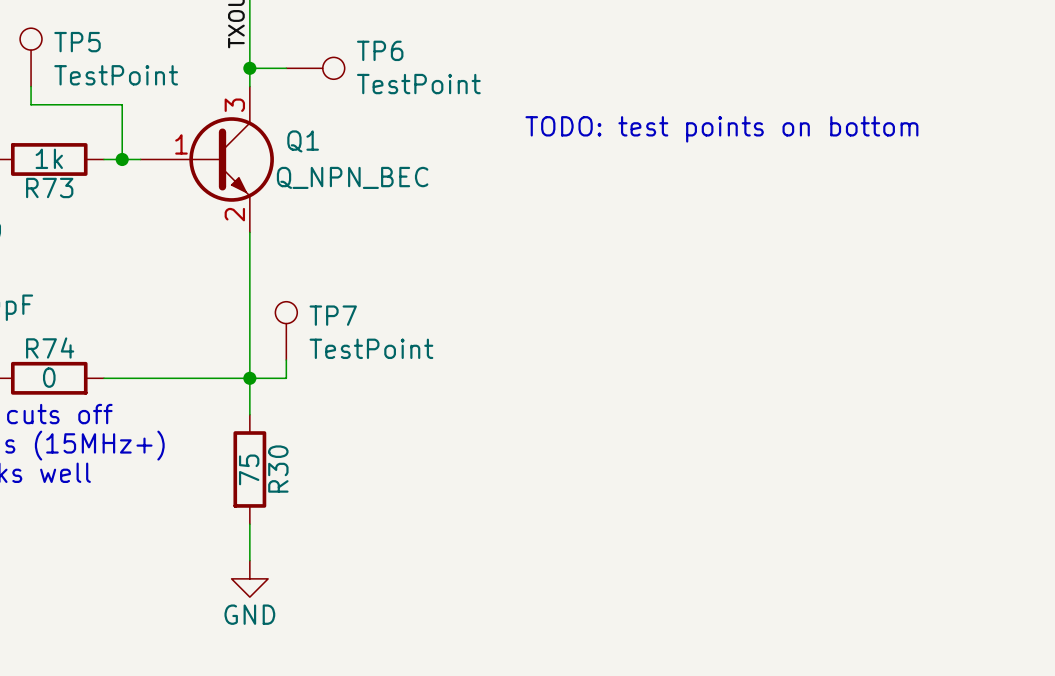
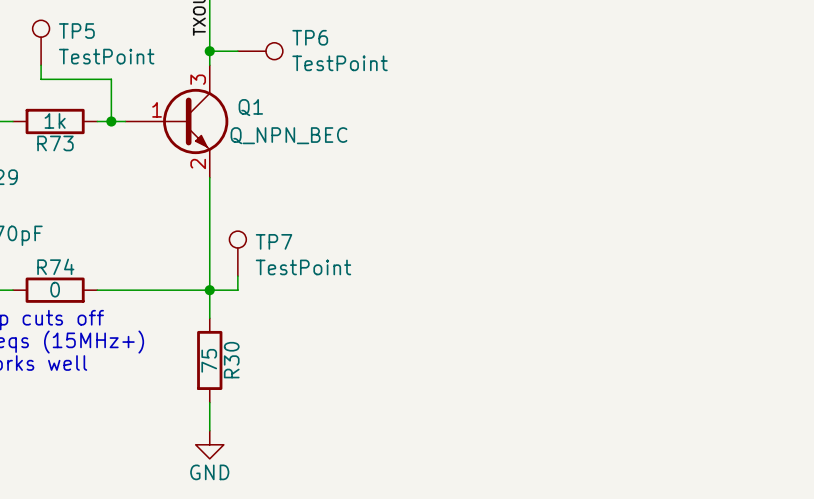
text: TODO: test points on bottom (721, 129) -> none

